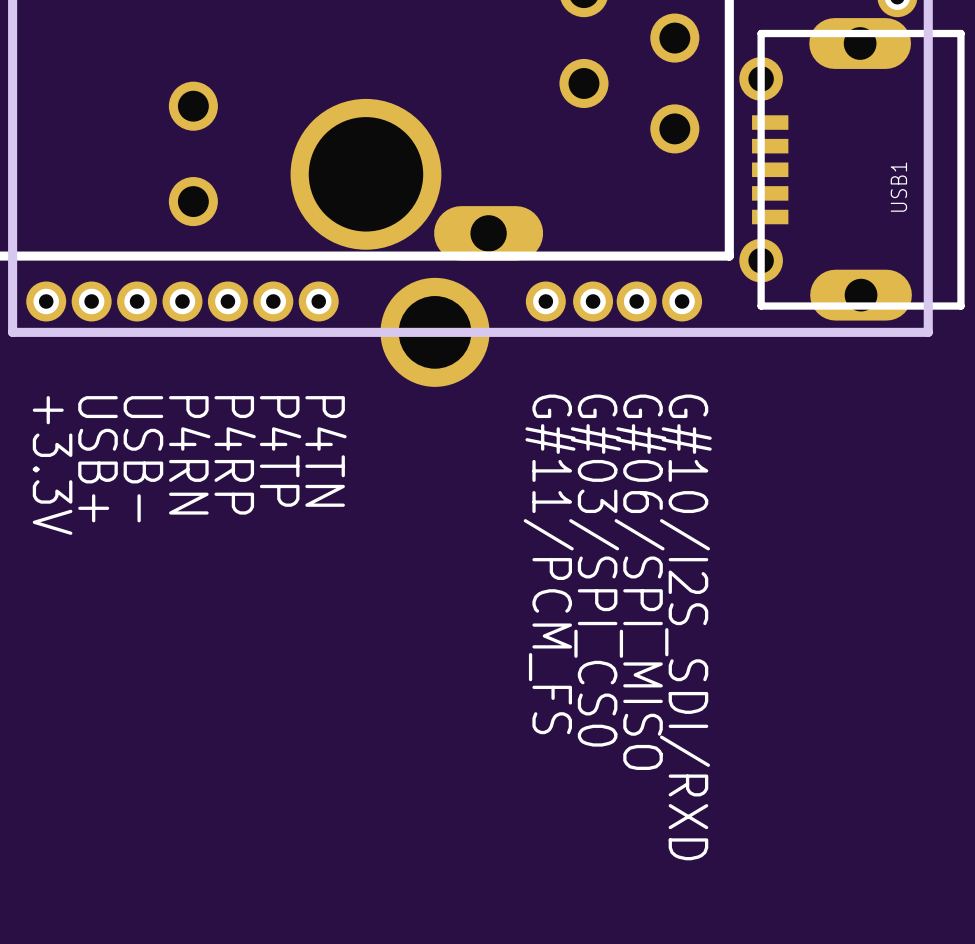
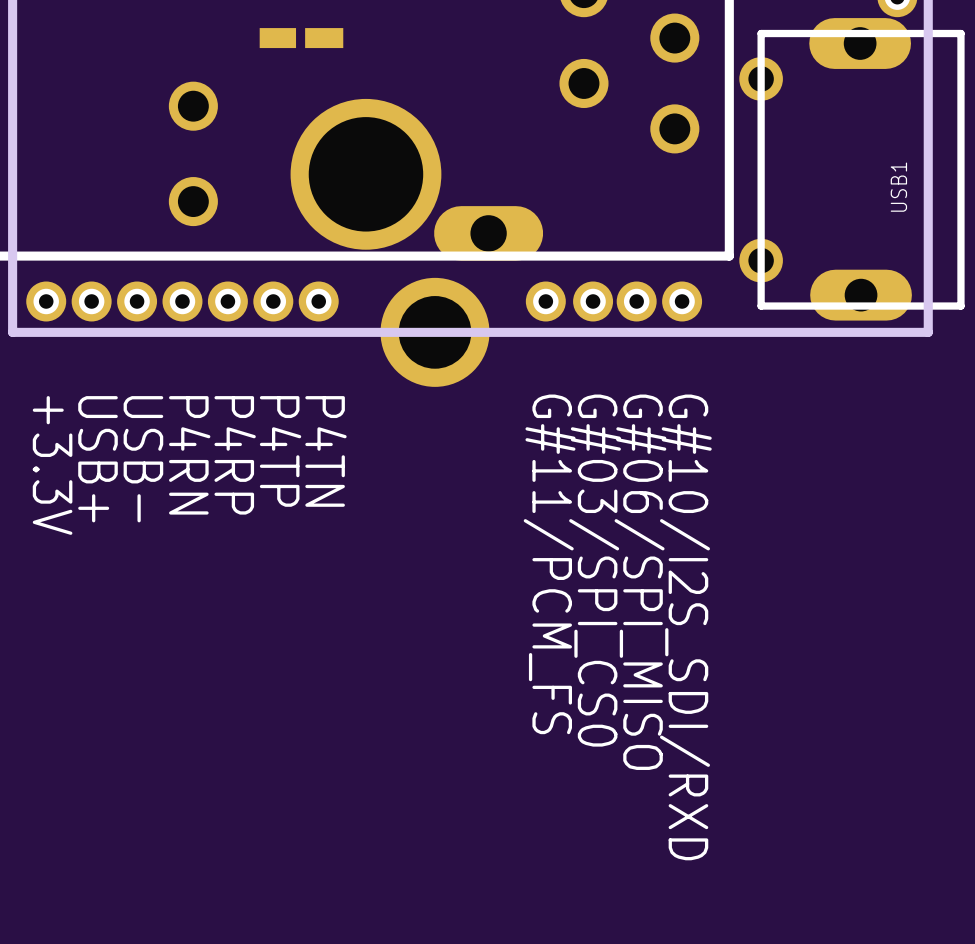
USB1 footprint: [739, 18, 965, 321] -> [739, 18, 965, 321]
part: none -> (301, 38)

